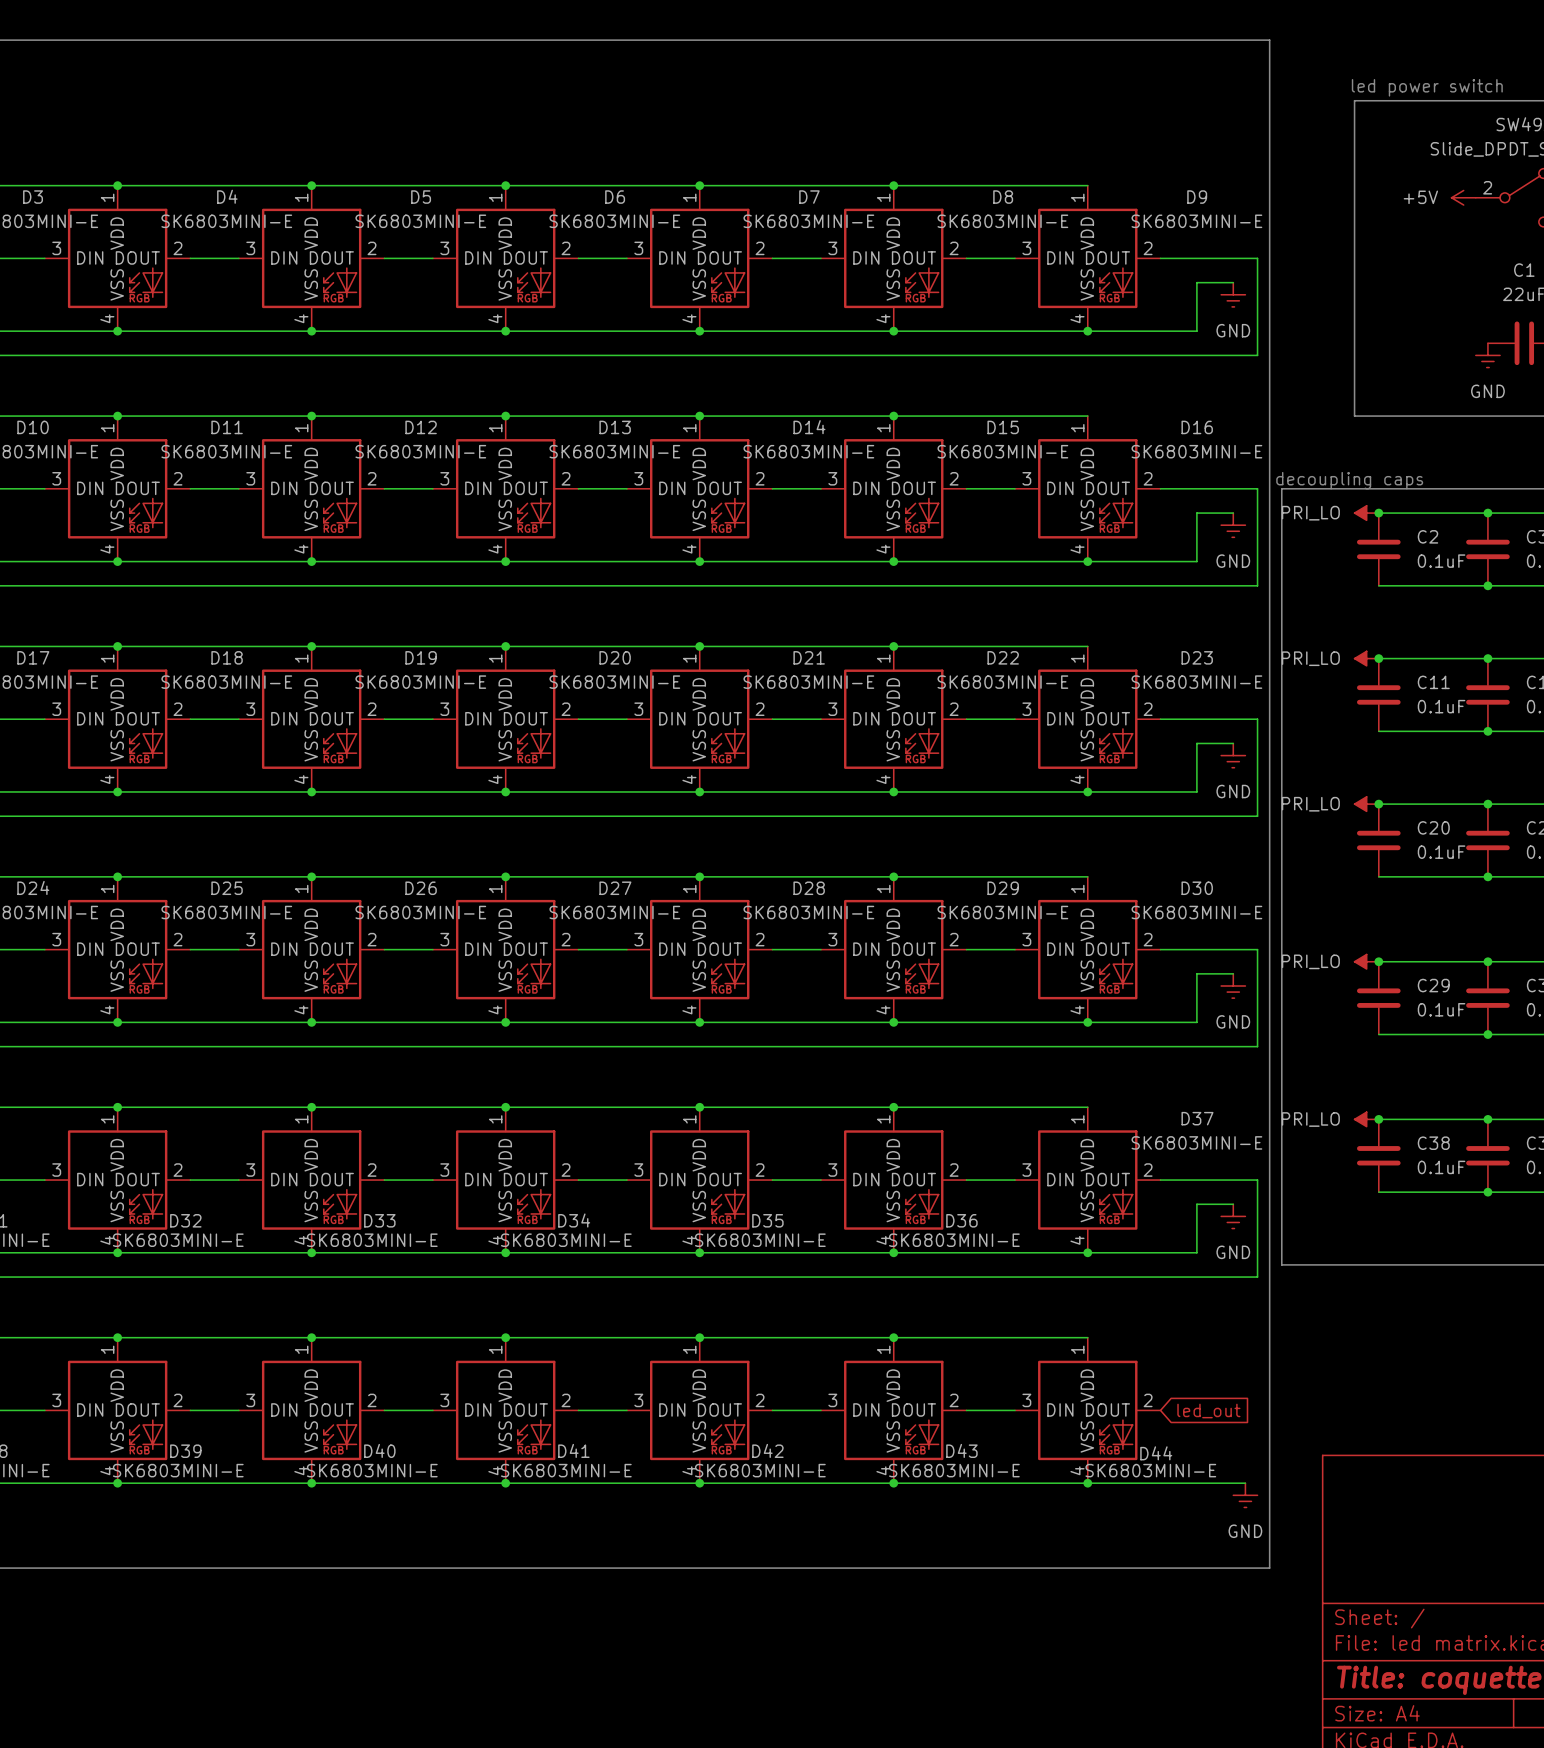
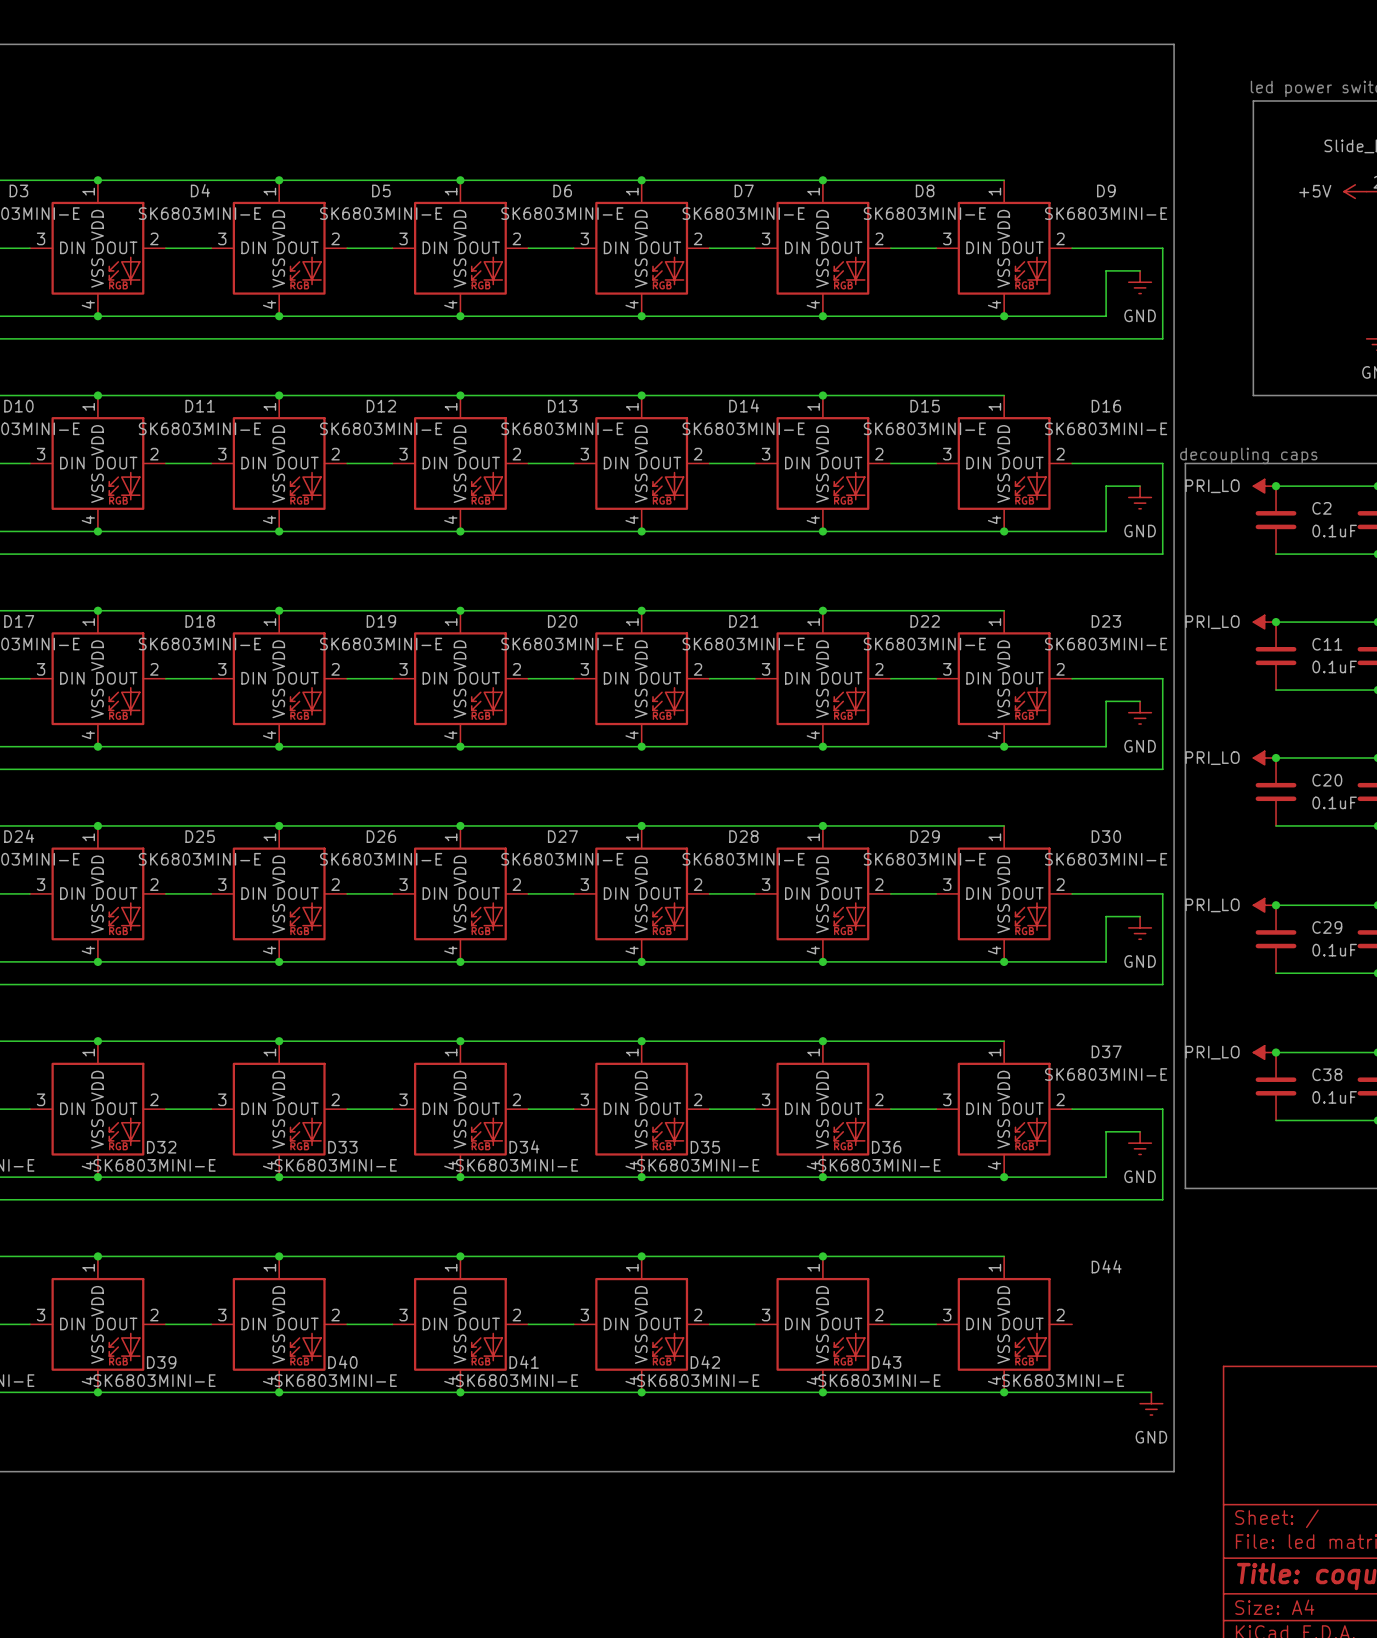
global label: led_out (1208, 1411) -> none
D44 name position: D44 (1156, 1453) -> D44 (1106, 1266)

